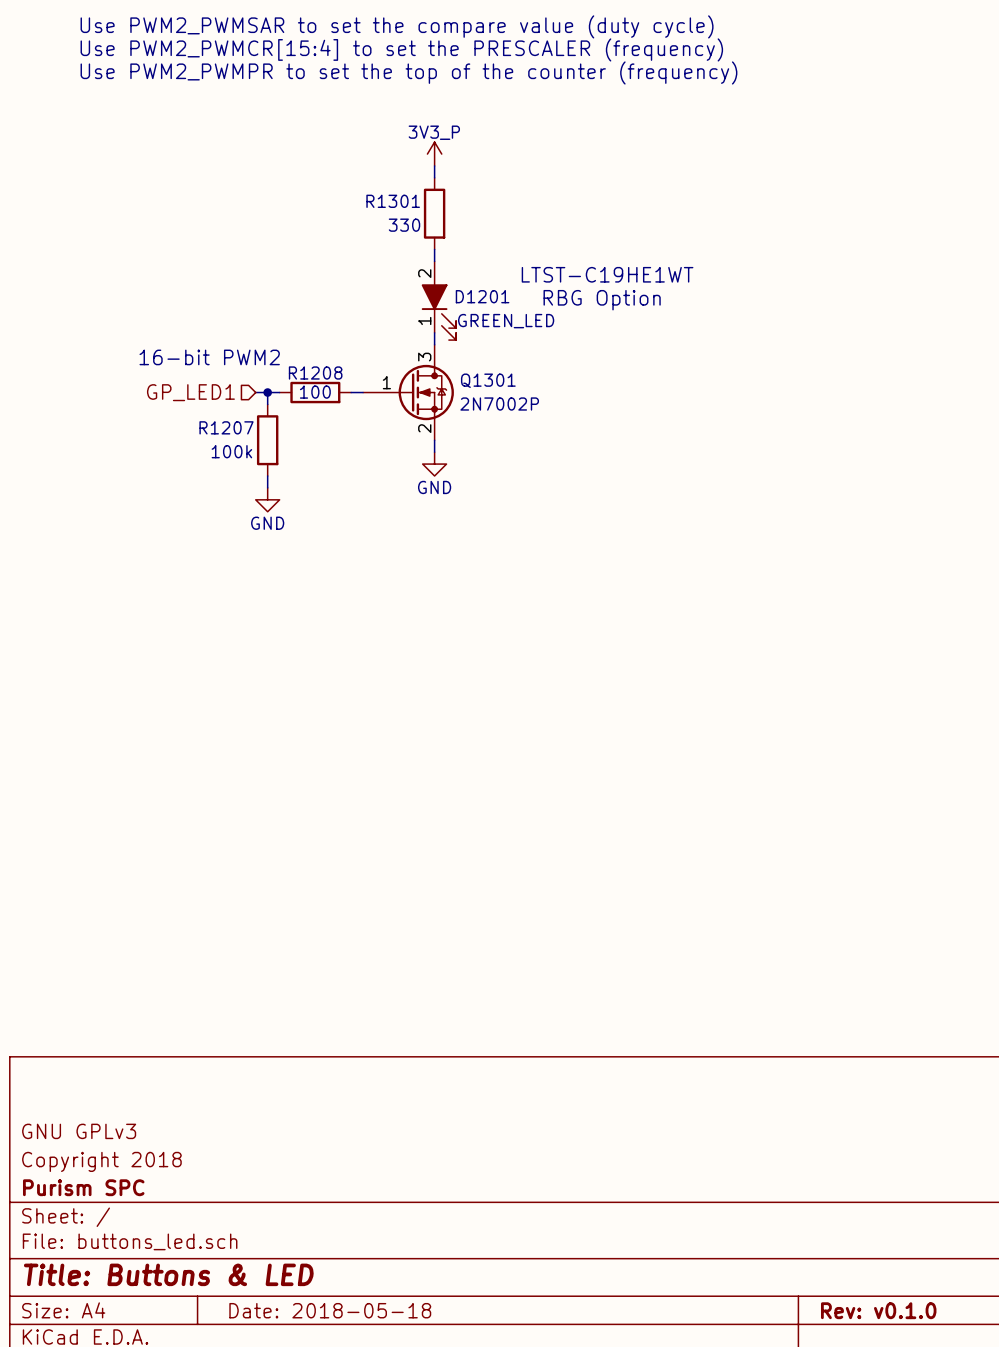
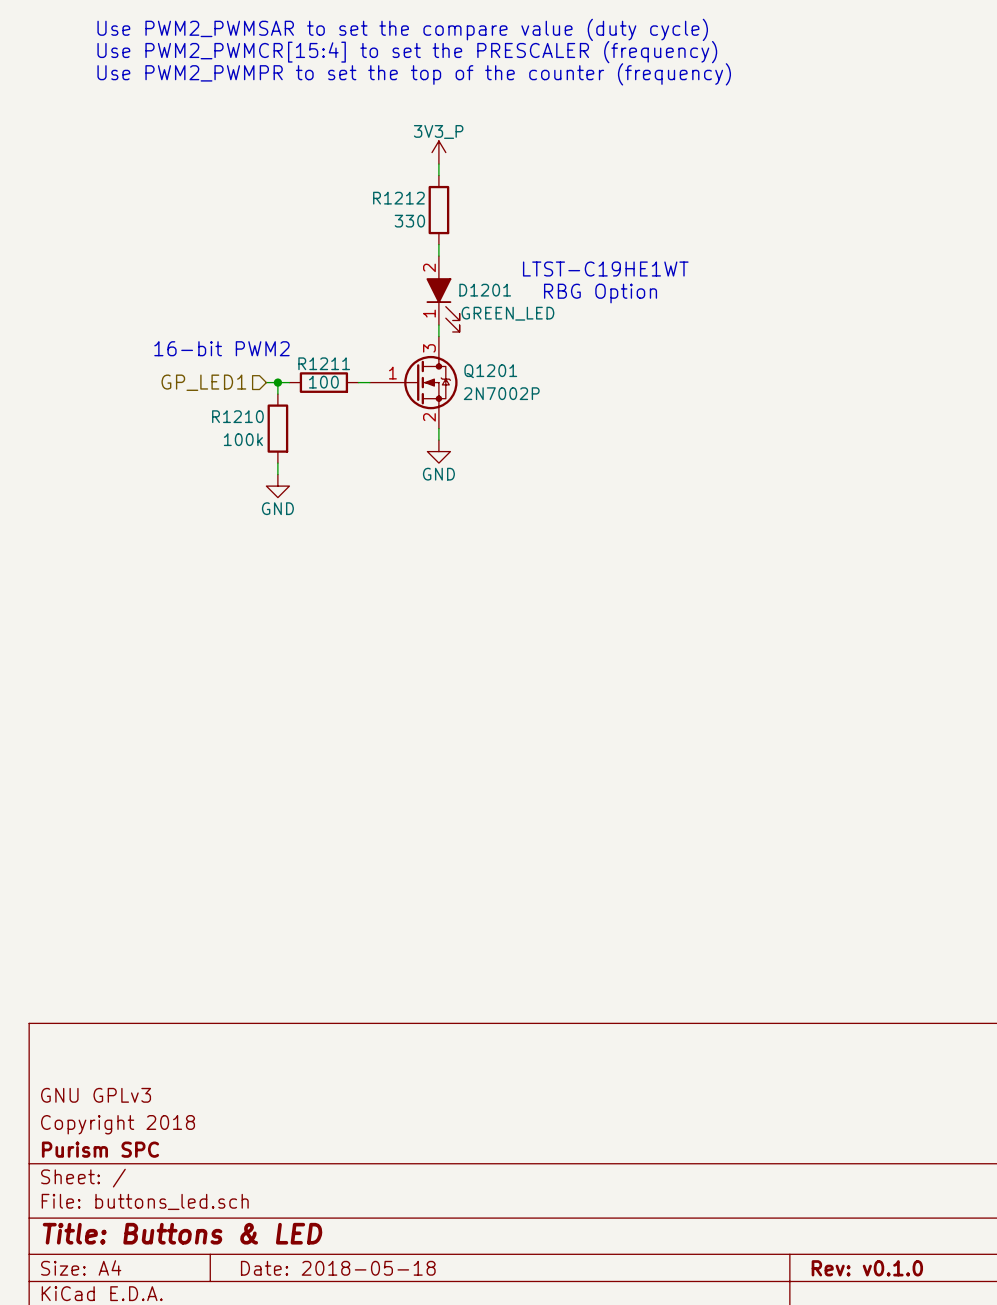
R1301 name: R1301 (393, 201) -> R1212 (398, 198)
R1208 name: R1208 (315, 373) -> R1211 (324, 363)
Q1301 name: Q1301 (488, 380) -> Q1201 (490, 371)
R1207 name: R1207 (226, 427) -> R1210 (237, 416)

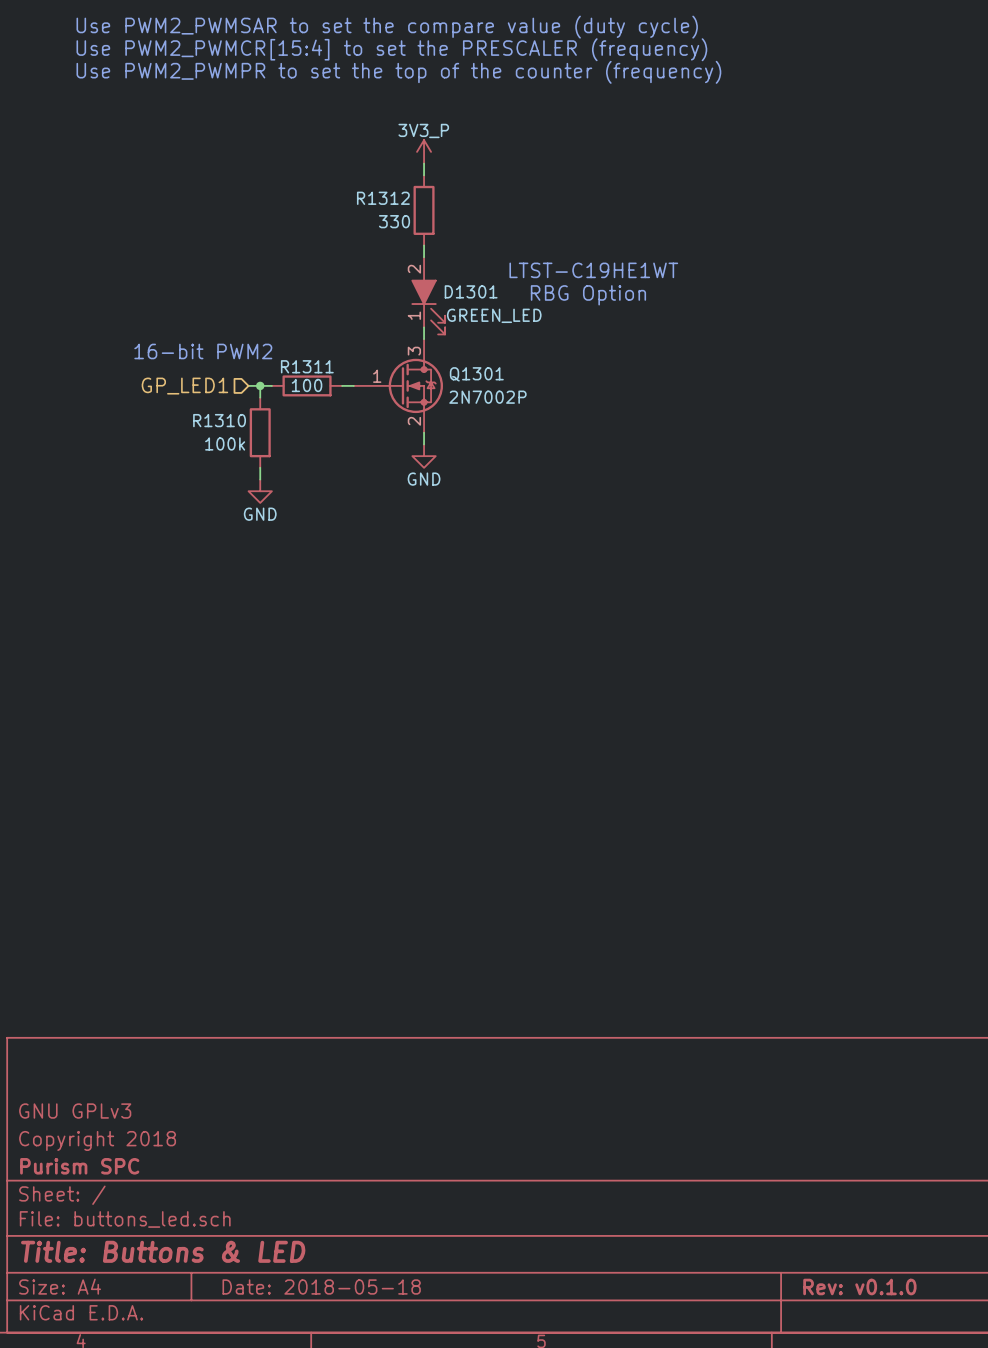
R1212 name: R1212 (398, 198) -> R1312 (383, 198)
D1201 name: D1201 (485, 290) -> D1301 (471, 291)
R1211 name: R1211 (324, 363) -> R1311 (307, 366)
Q1201 name: Q1201 (490, 371) -> Q1301 (476, 374)
R1210 name: R1210 (237, 416) -> R1310 (219, 420)

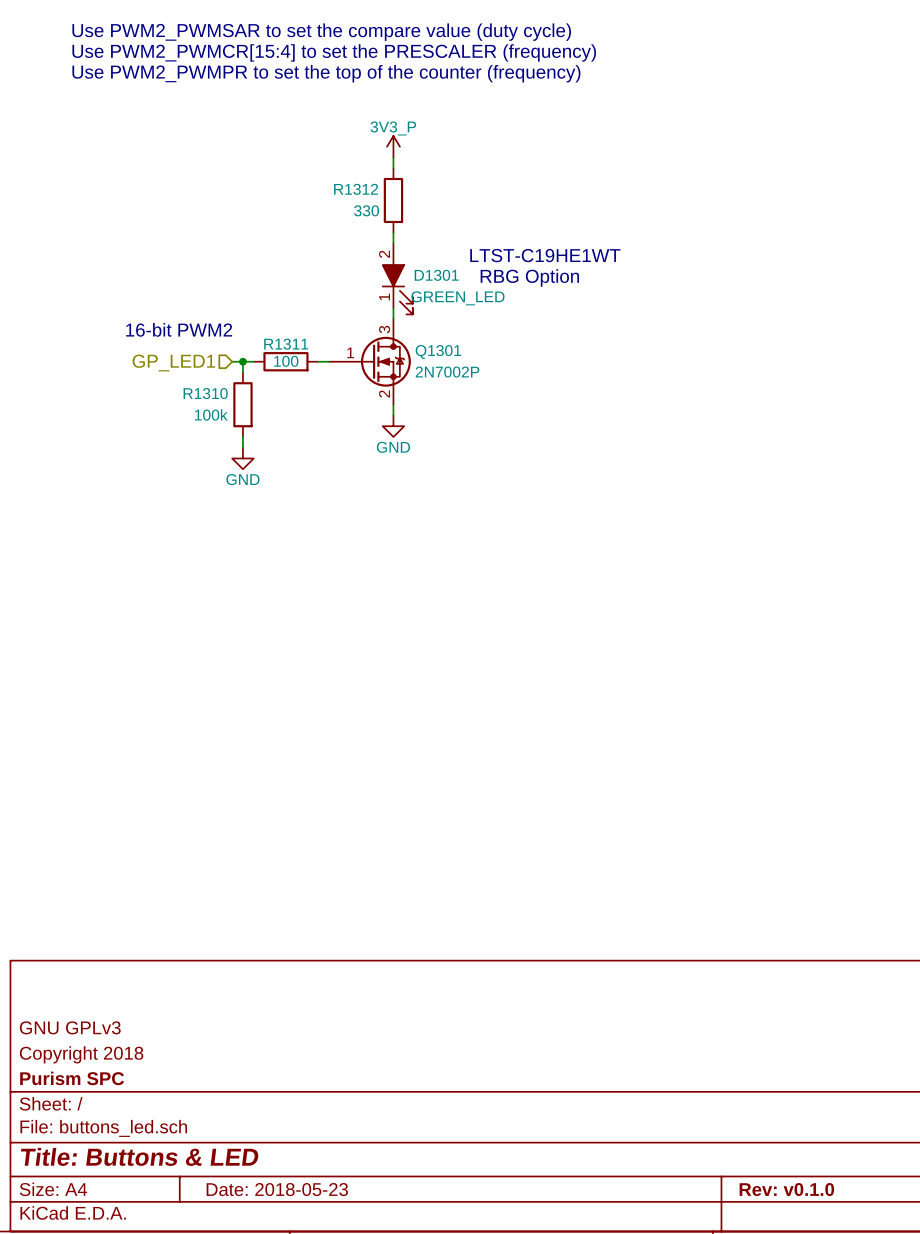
title block: Date: 2018-05-18 (321, 1286) -> Date: 2018-05-23 (277, 1189)

